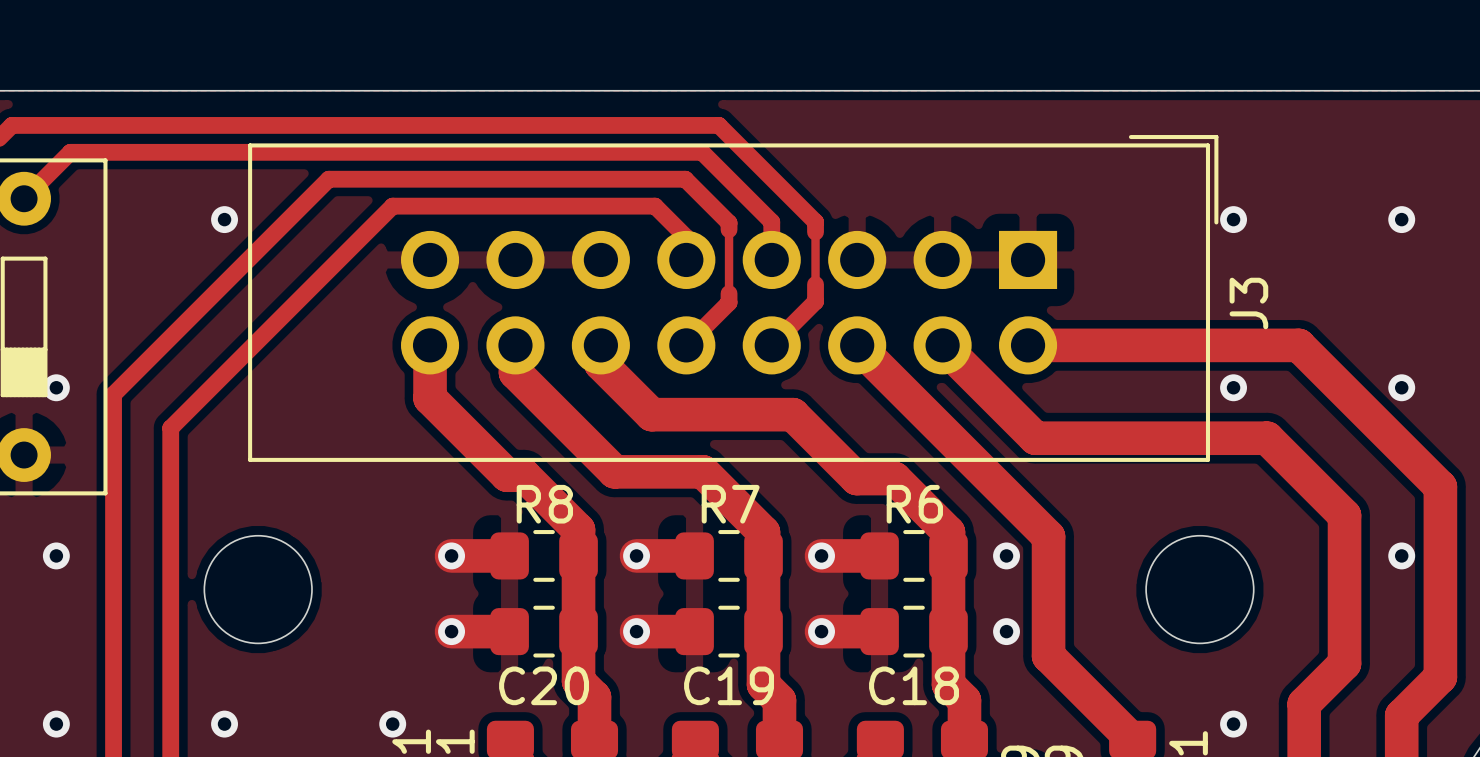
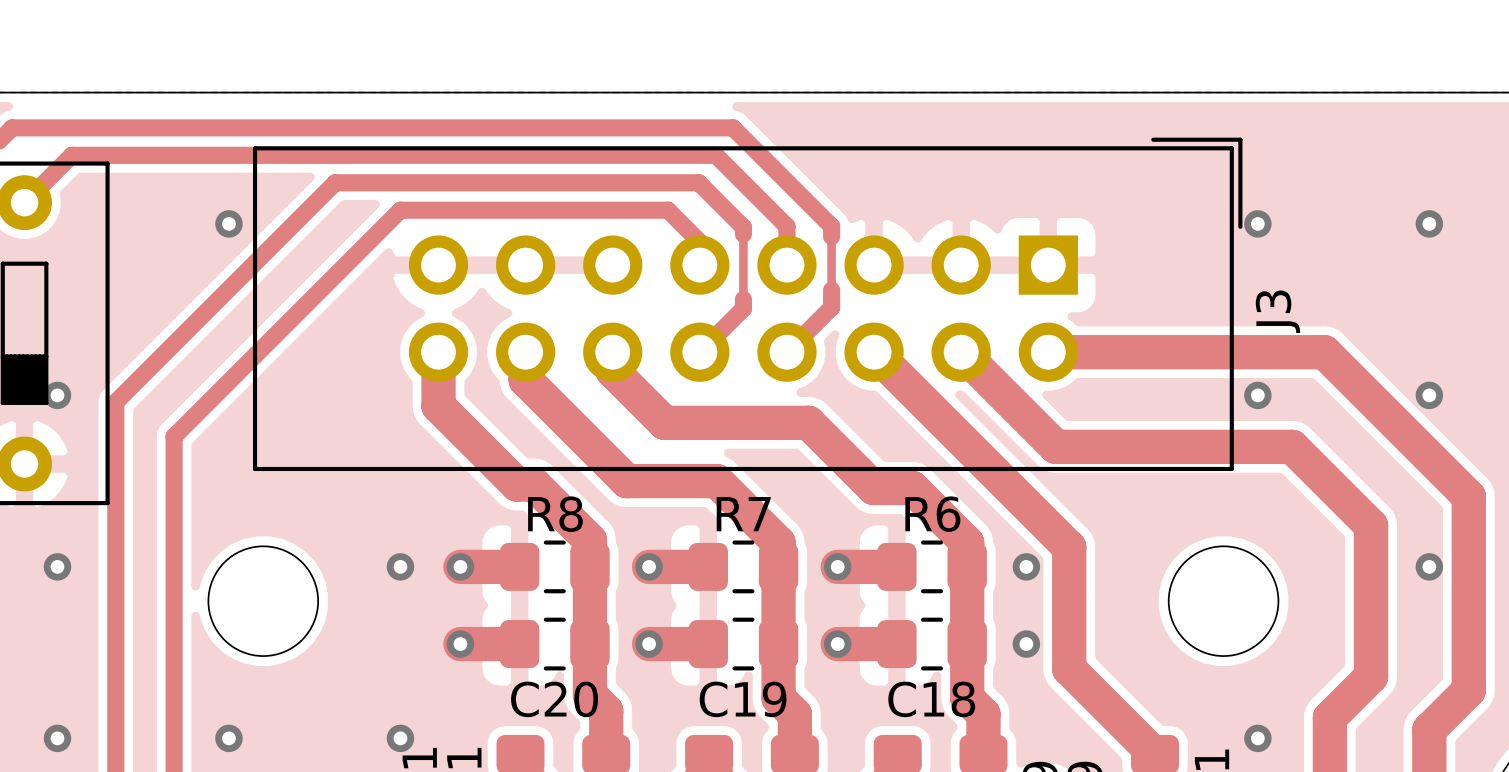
via: none -> (400, 566)

